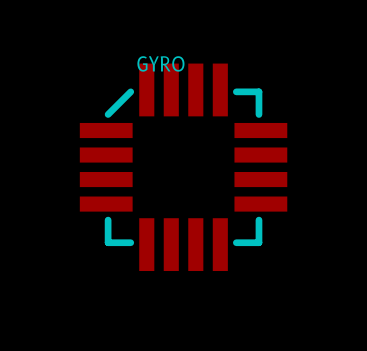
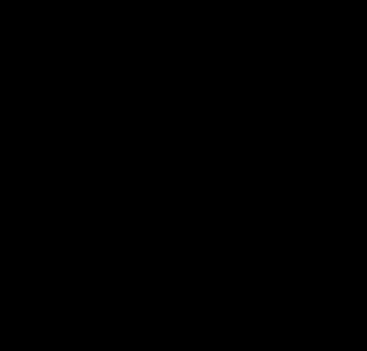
GYRO: (183, 167) -> none

